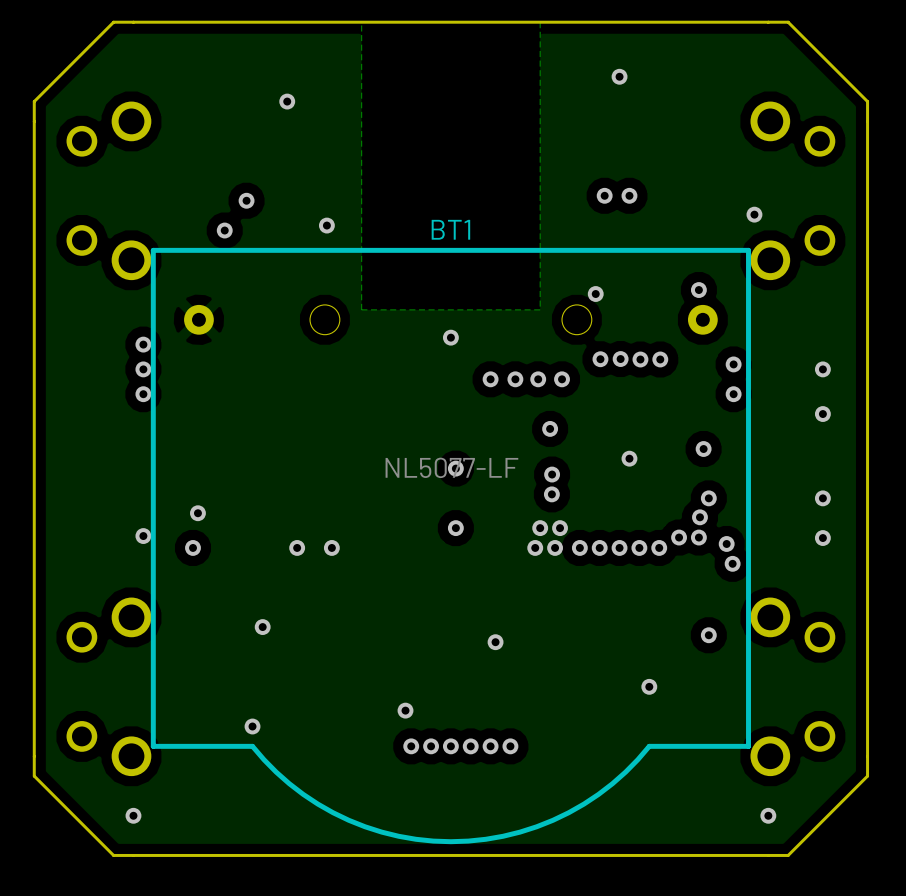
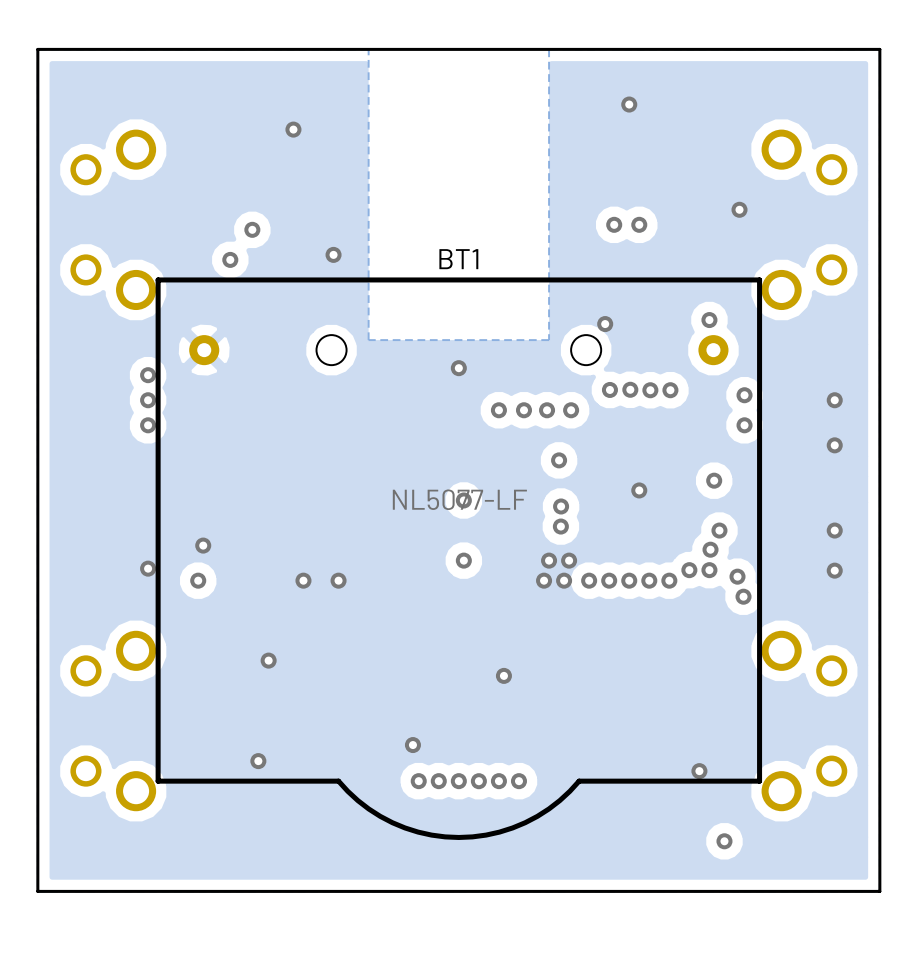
board edge: (113, 22) (34, 101) -> (118, 49) (37, 49) (37, 129)
board edge: (788, 22) (867, 101) -> (799, 49) (879, 49) (879, 129)
via position: (754, 214) -> (739, 209)
BT1 footprint: [150, 247, 751, 845] -> [155, 277, 763, 840]
via: (708, 635) -> none
via: (649, 686) -> none
via: none -> (699, 771)
board edge: (34, 776) (113, 855) -> (37, 811) (37, 891) (118, 891)
board edge: (867, 776) (788, 855) -> (879, 811) (879, 891) (799, 891)
via: (133, 815) -> none
via position: (768, 815) -> (724, 841)

